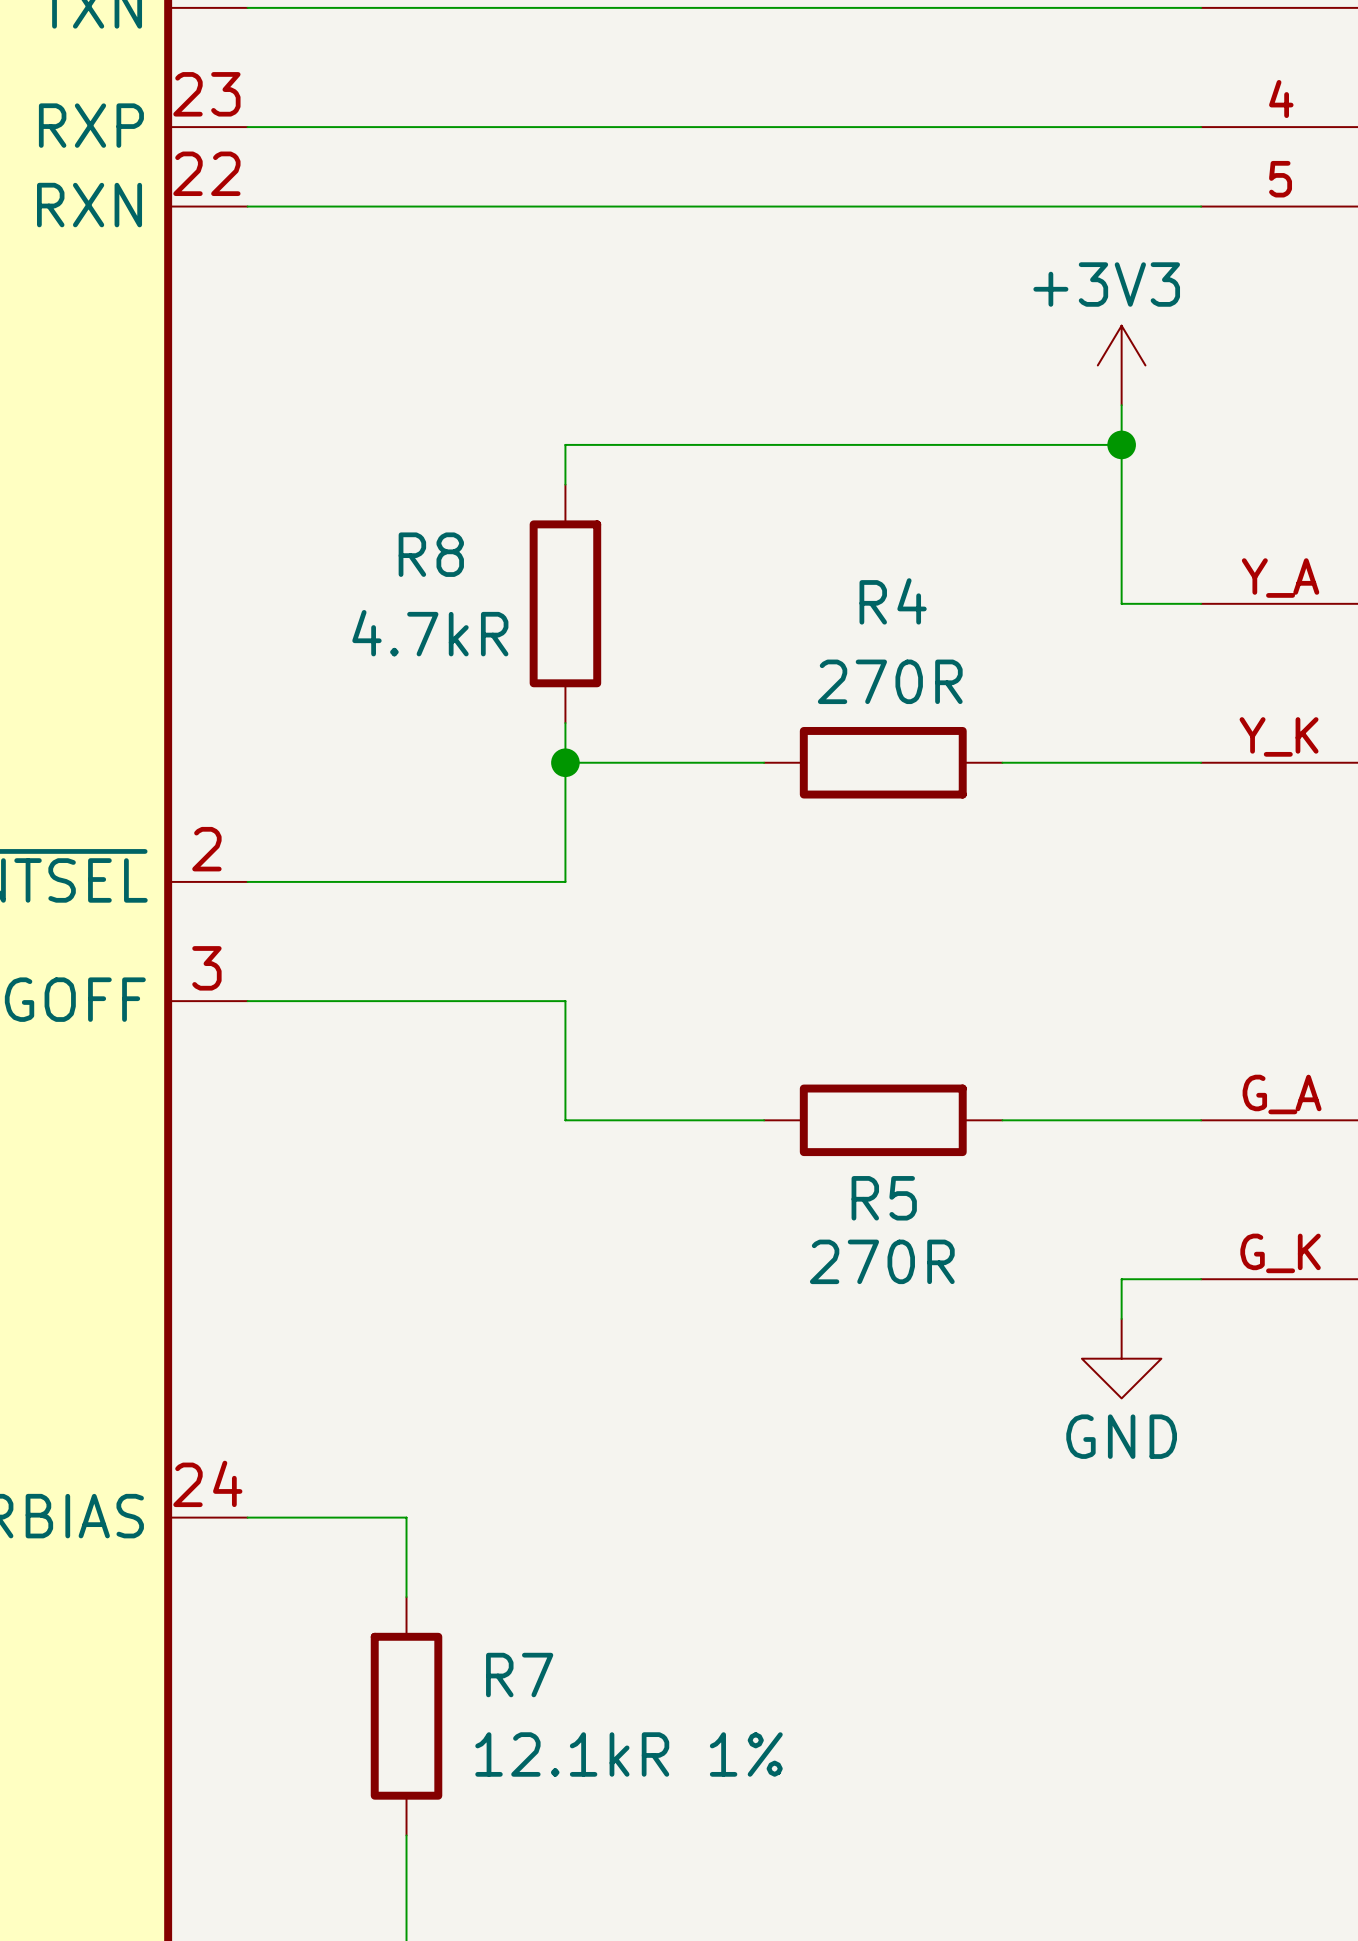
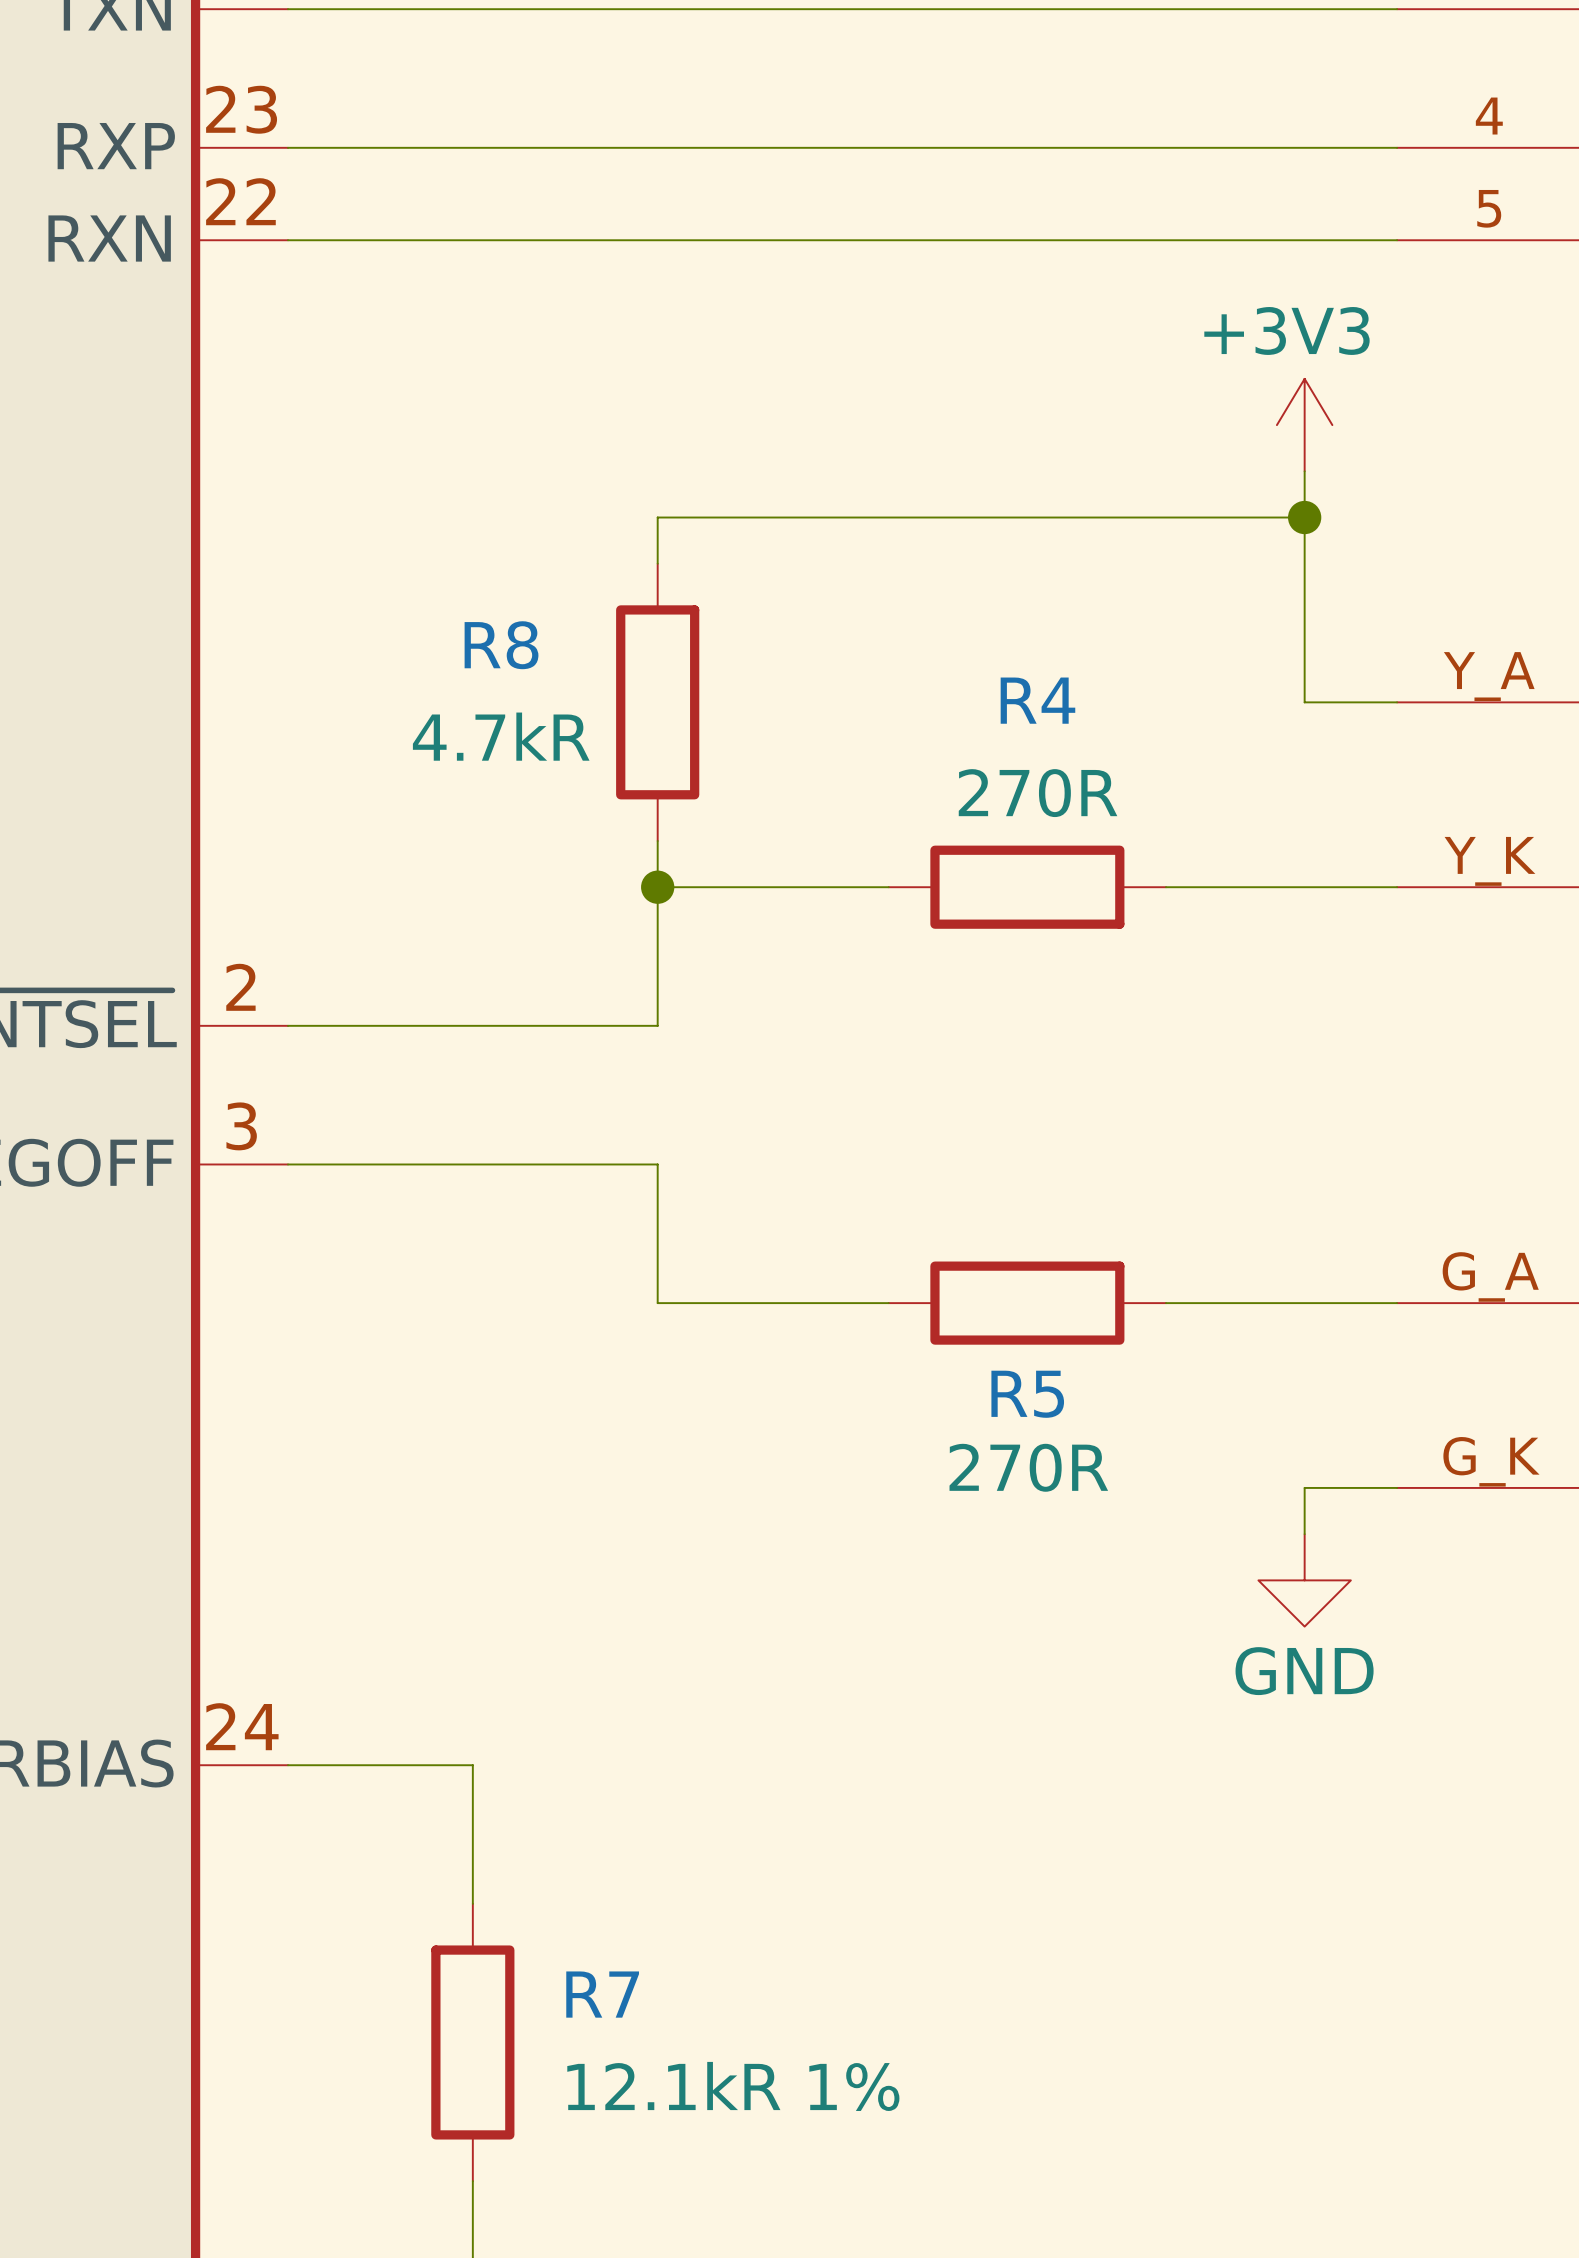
R7 position: (406, 1716) -> (472, 2042)

